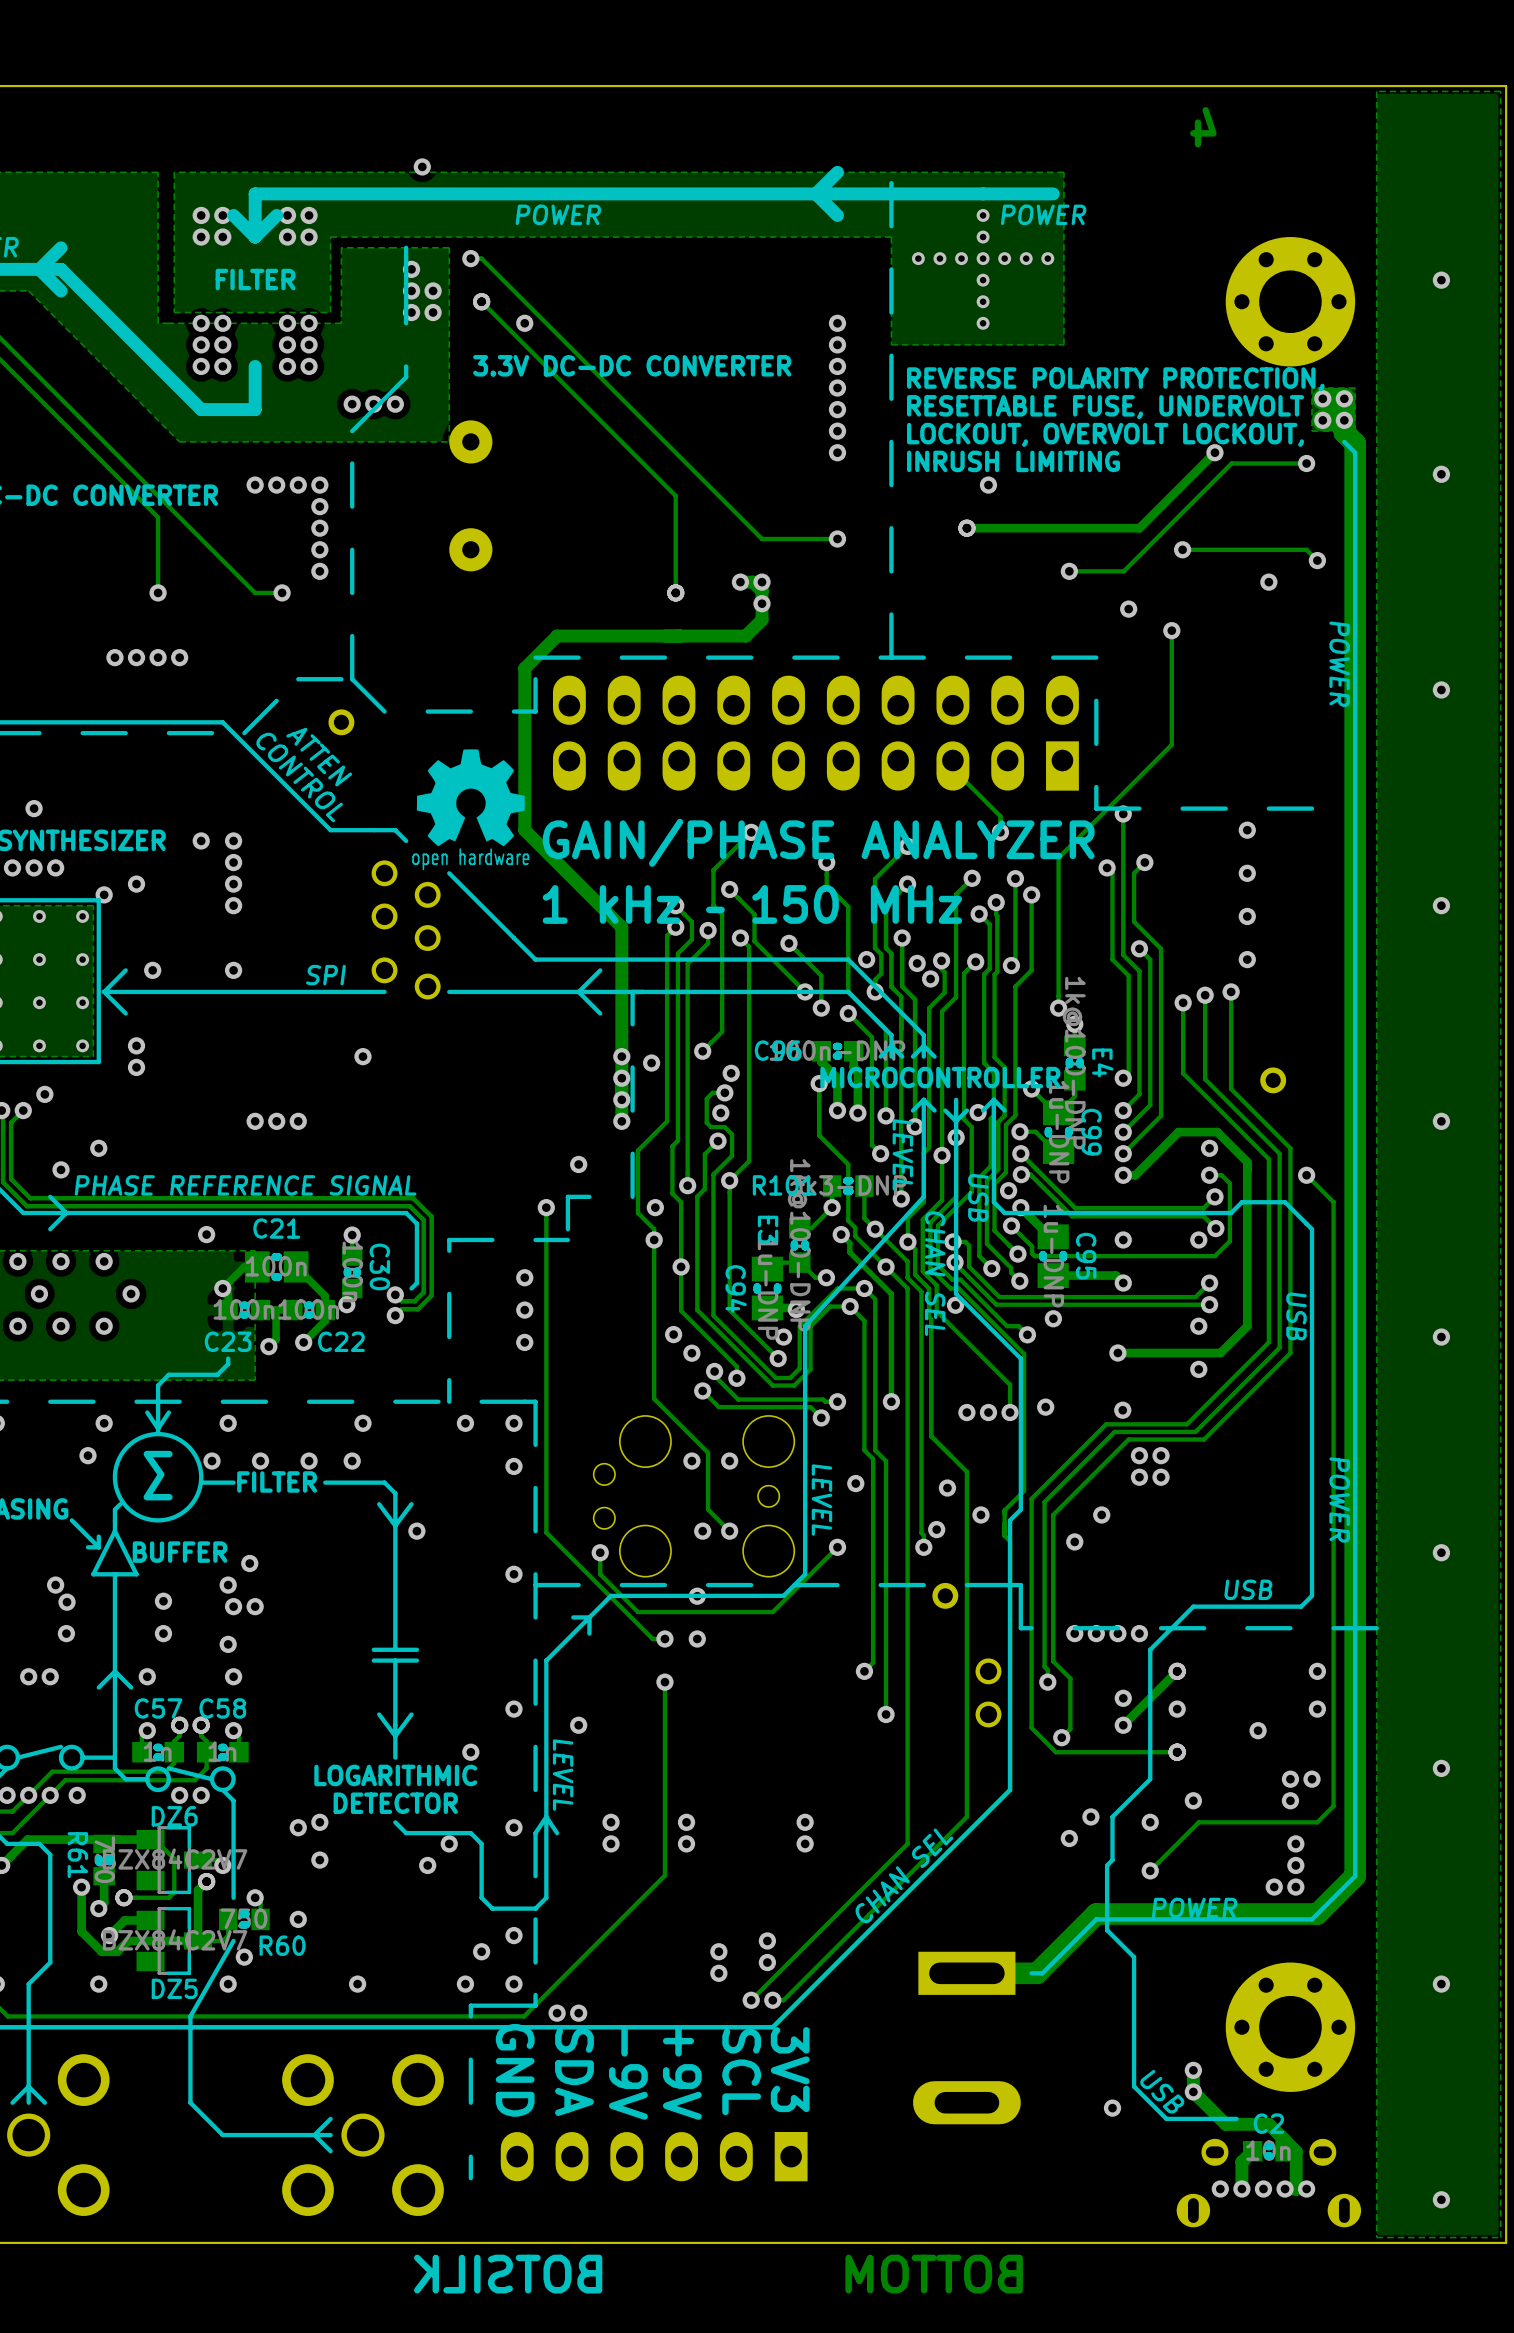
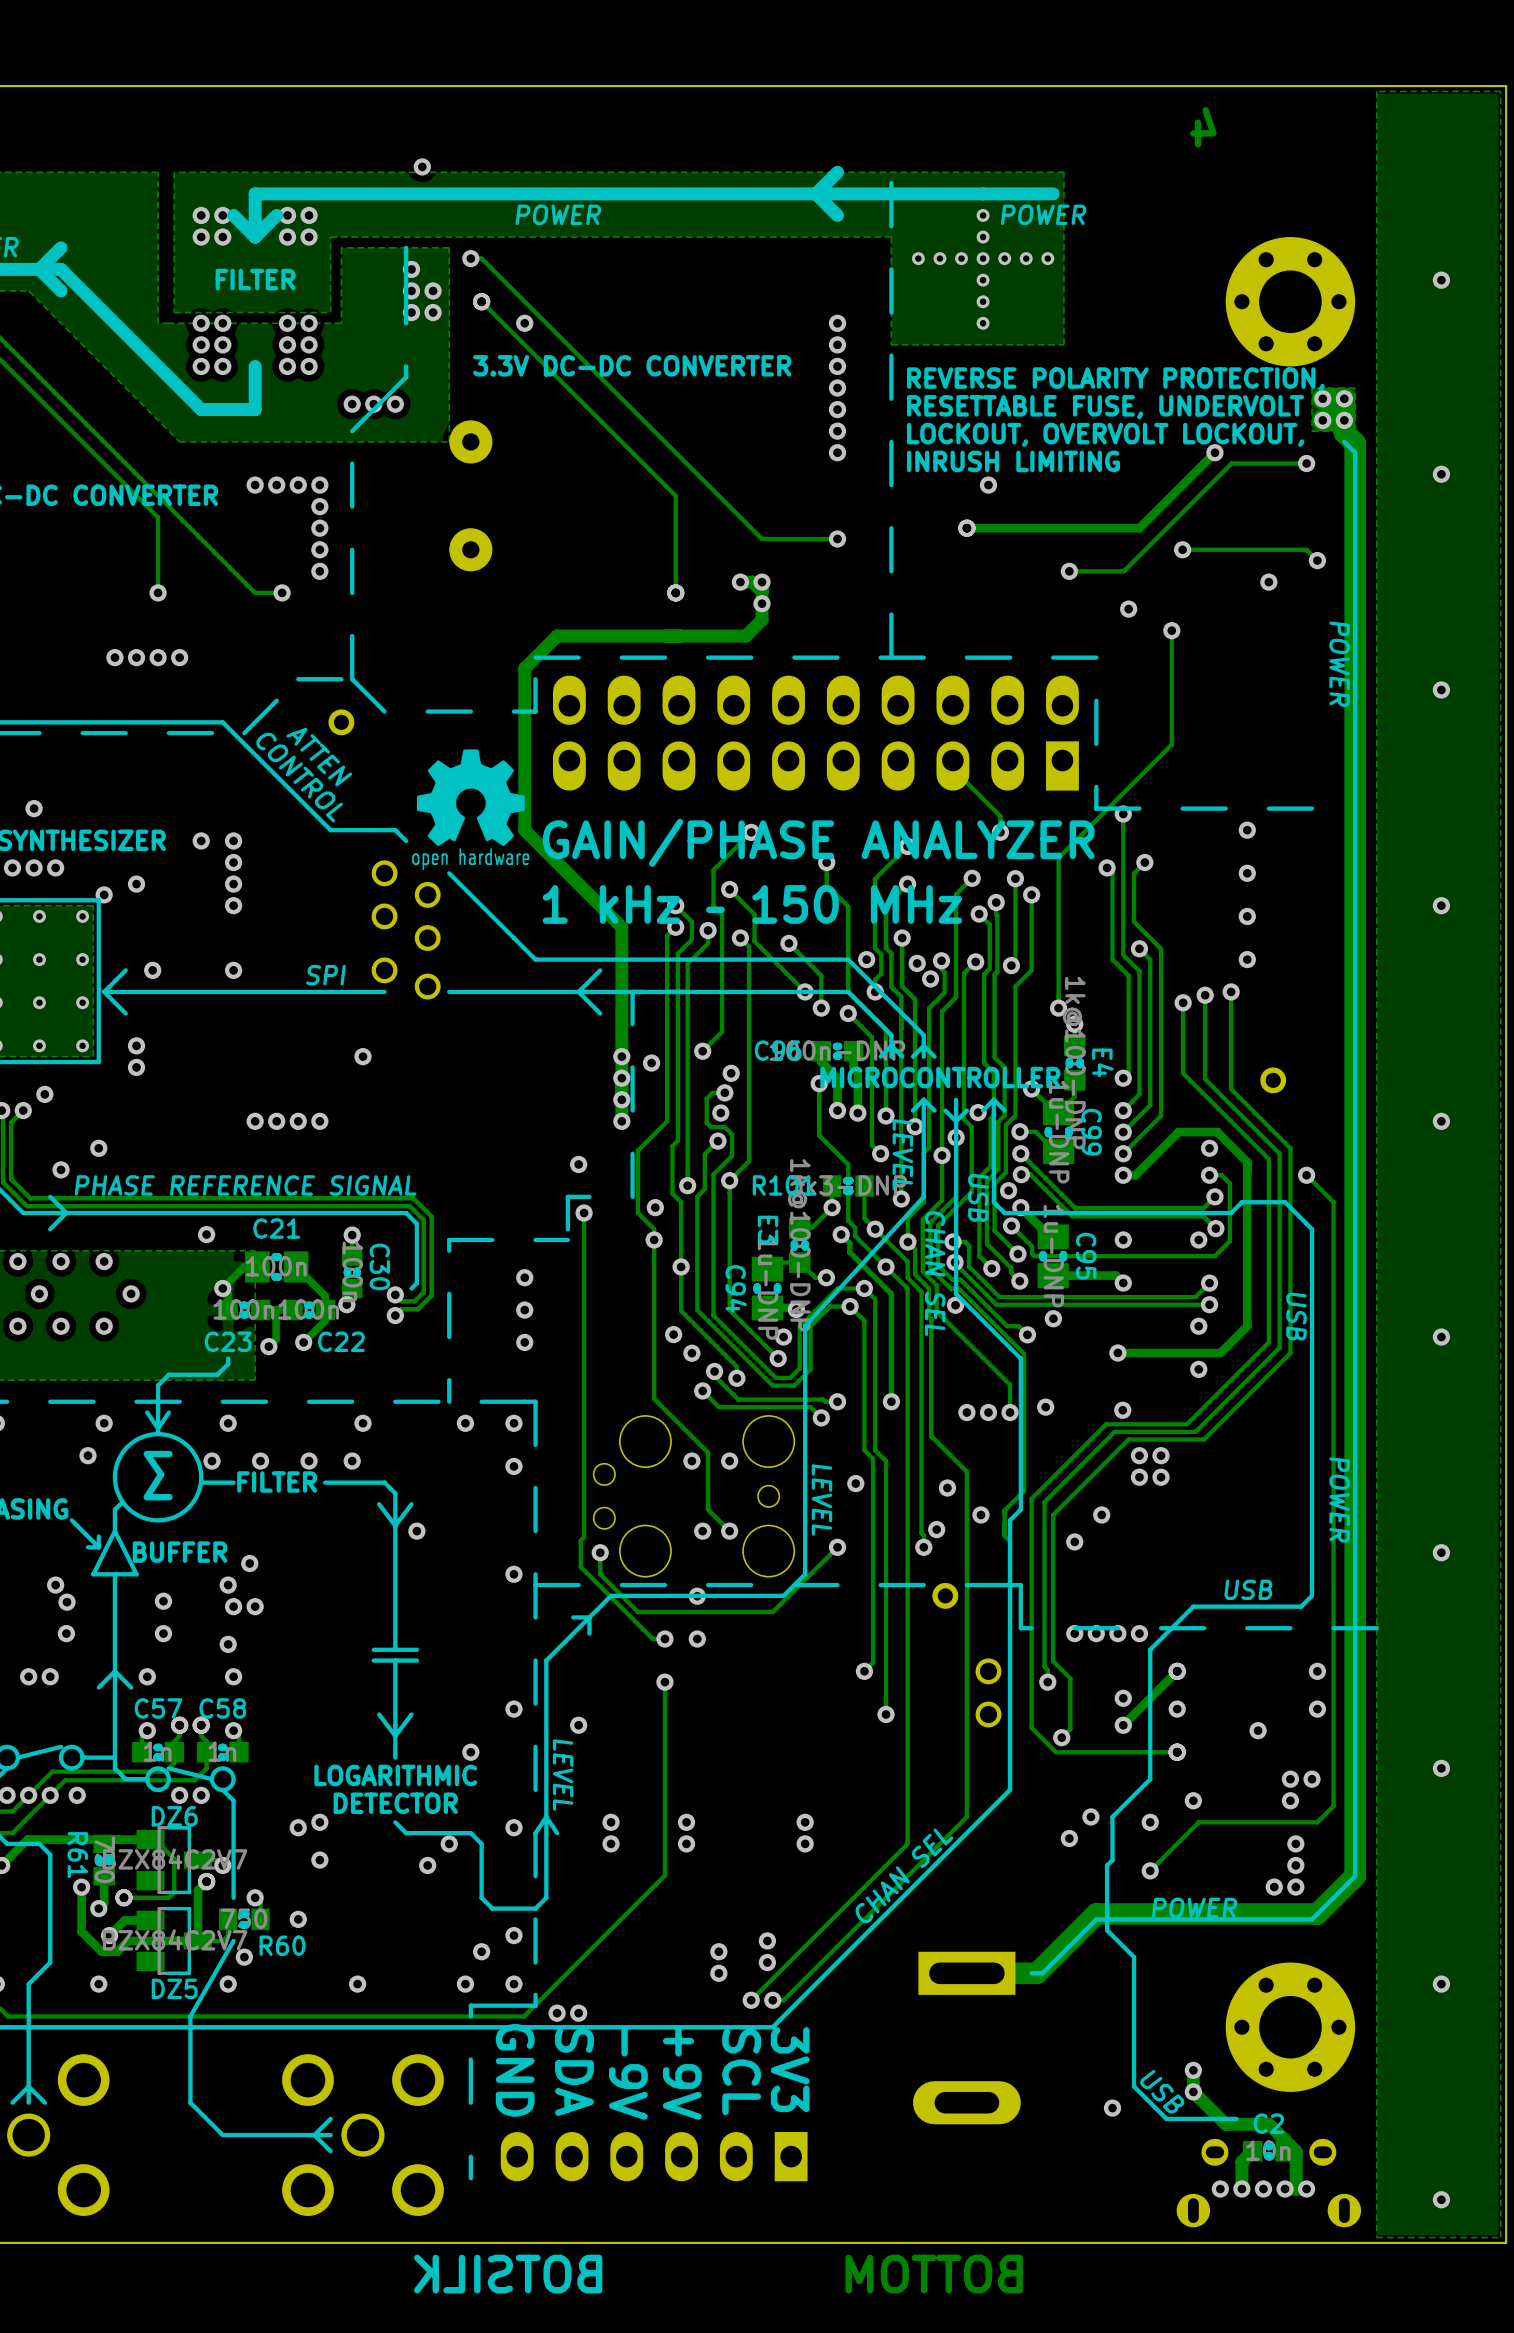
via: none -> (319, 1121)
track: (546, 1207) (546, 1532) (580, 1567) -> (584, 1213) (584, 1537) (580, 1540) (580, 1567)
via position: (546, 1207) -> (584, 1213)

